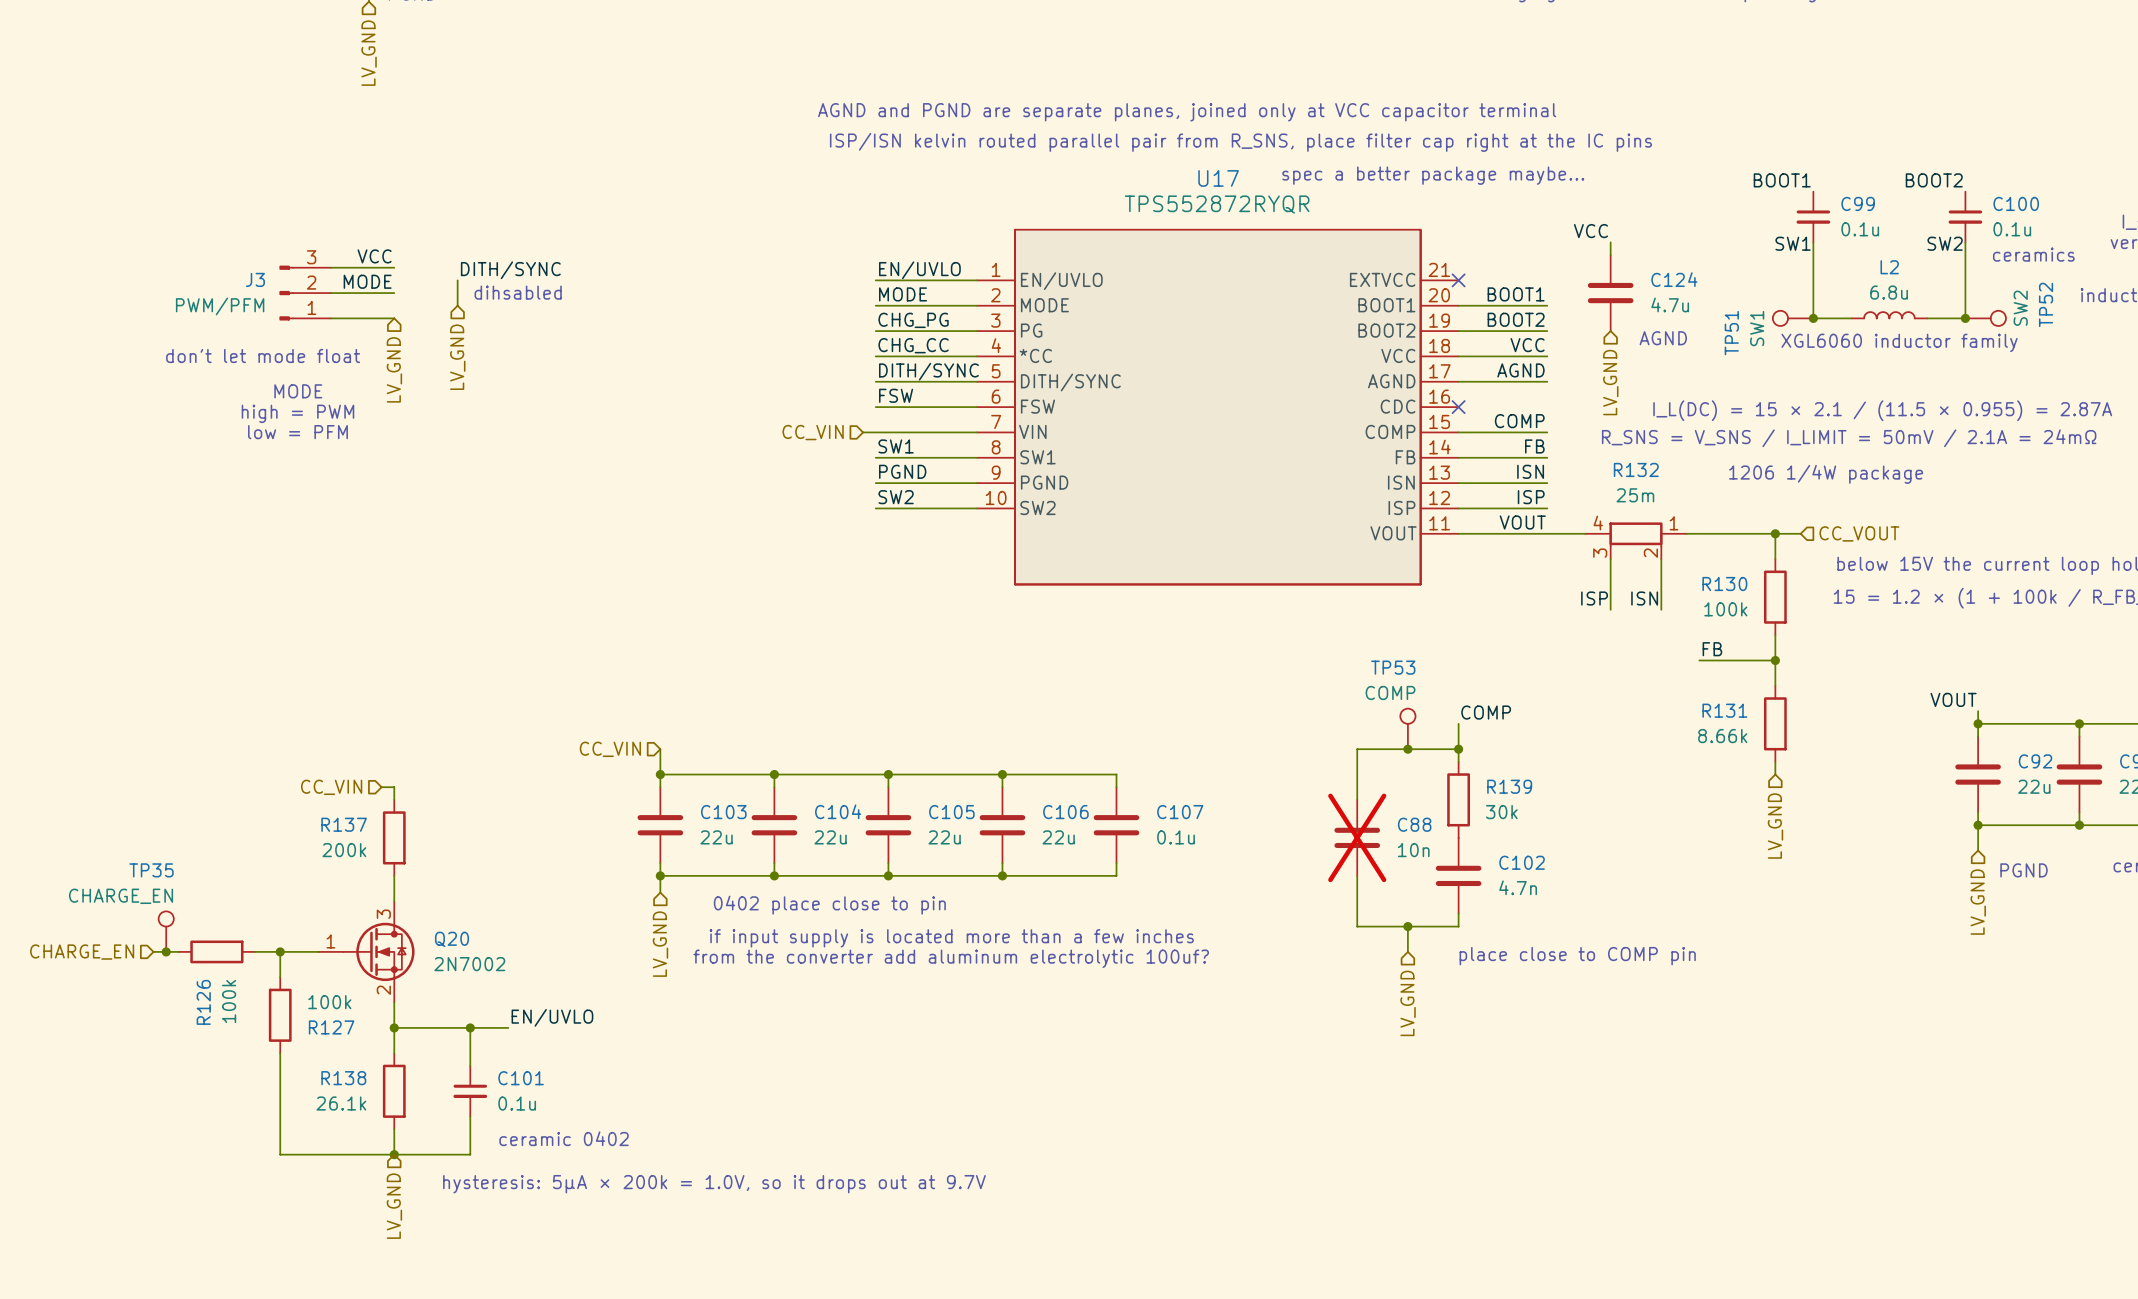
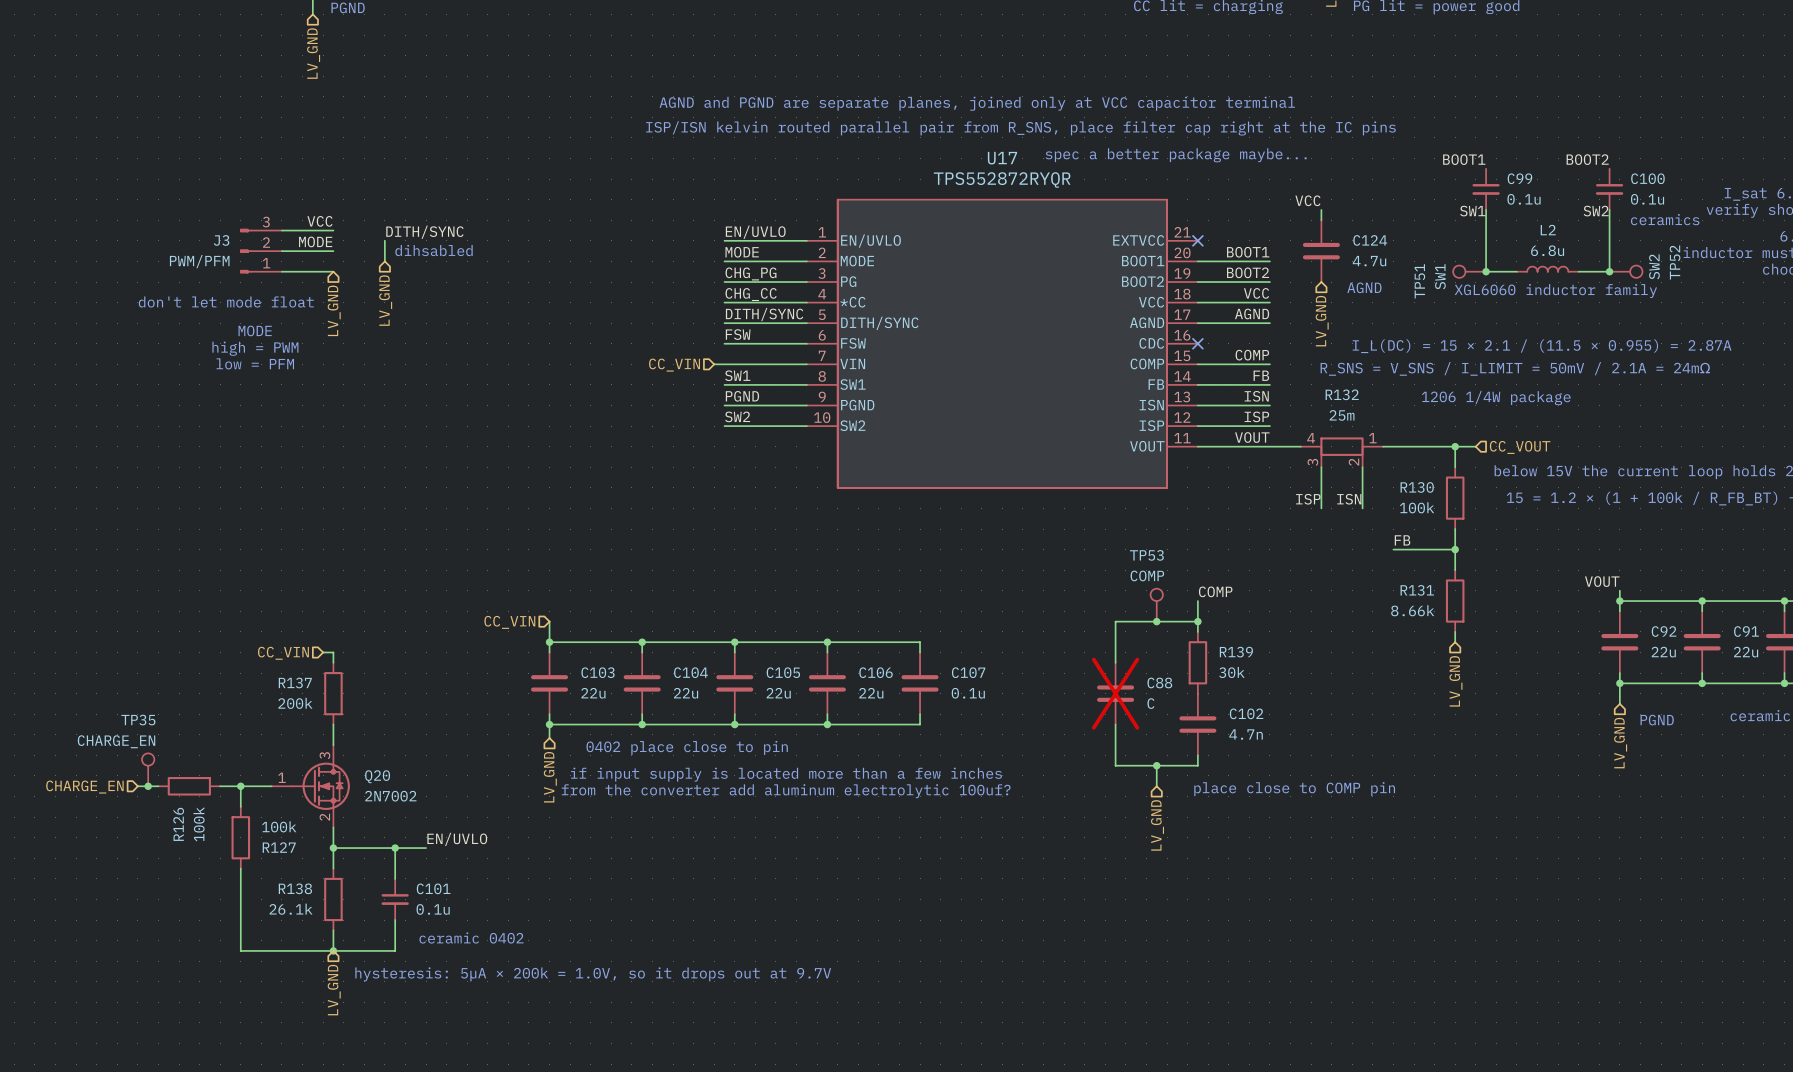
C88 value: 10n (1413, 850) -> C (1150, 703)

